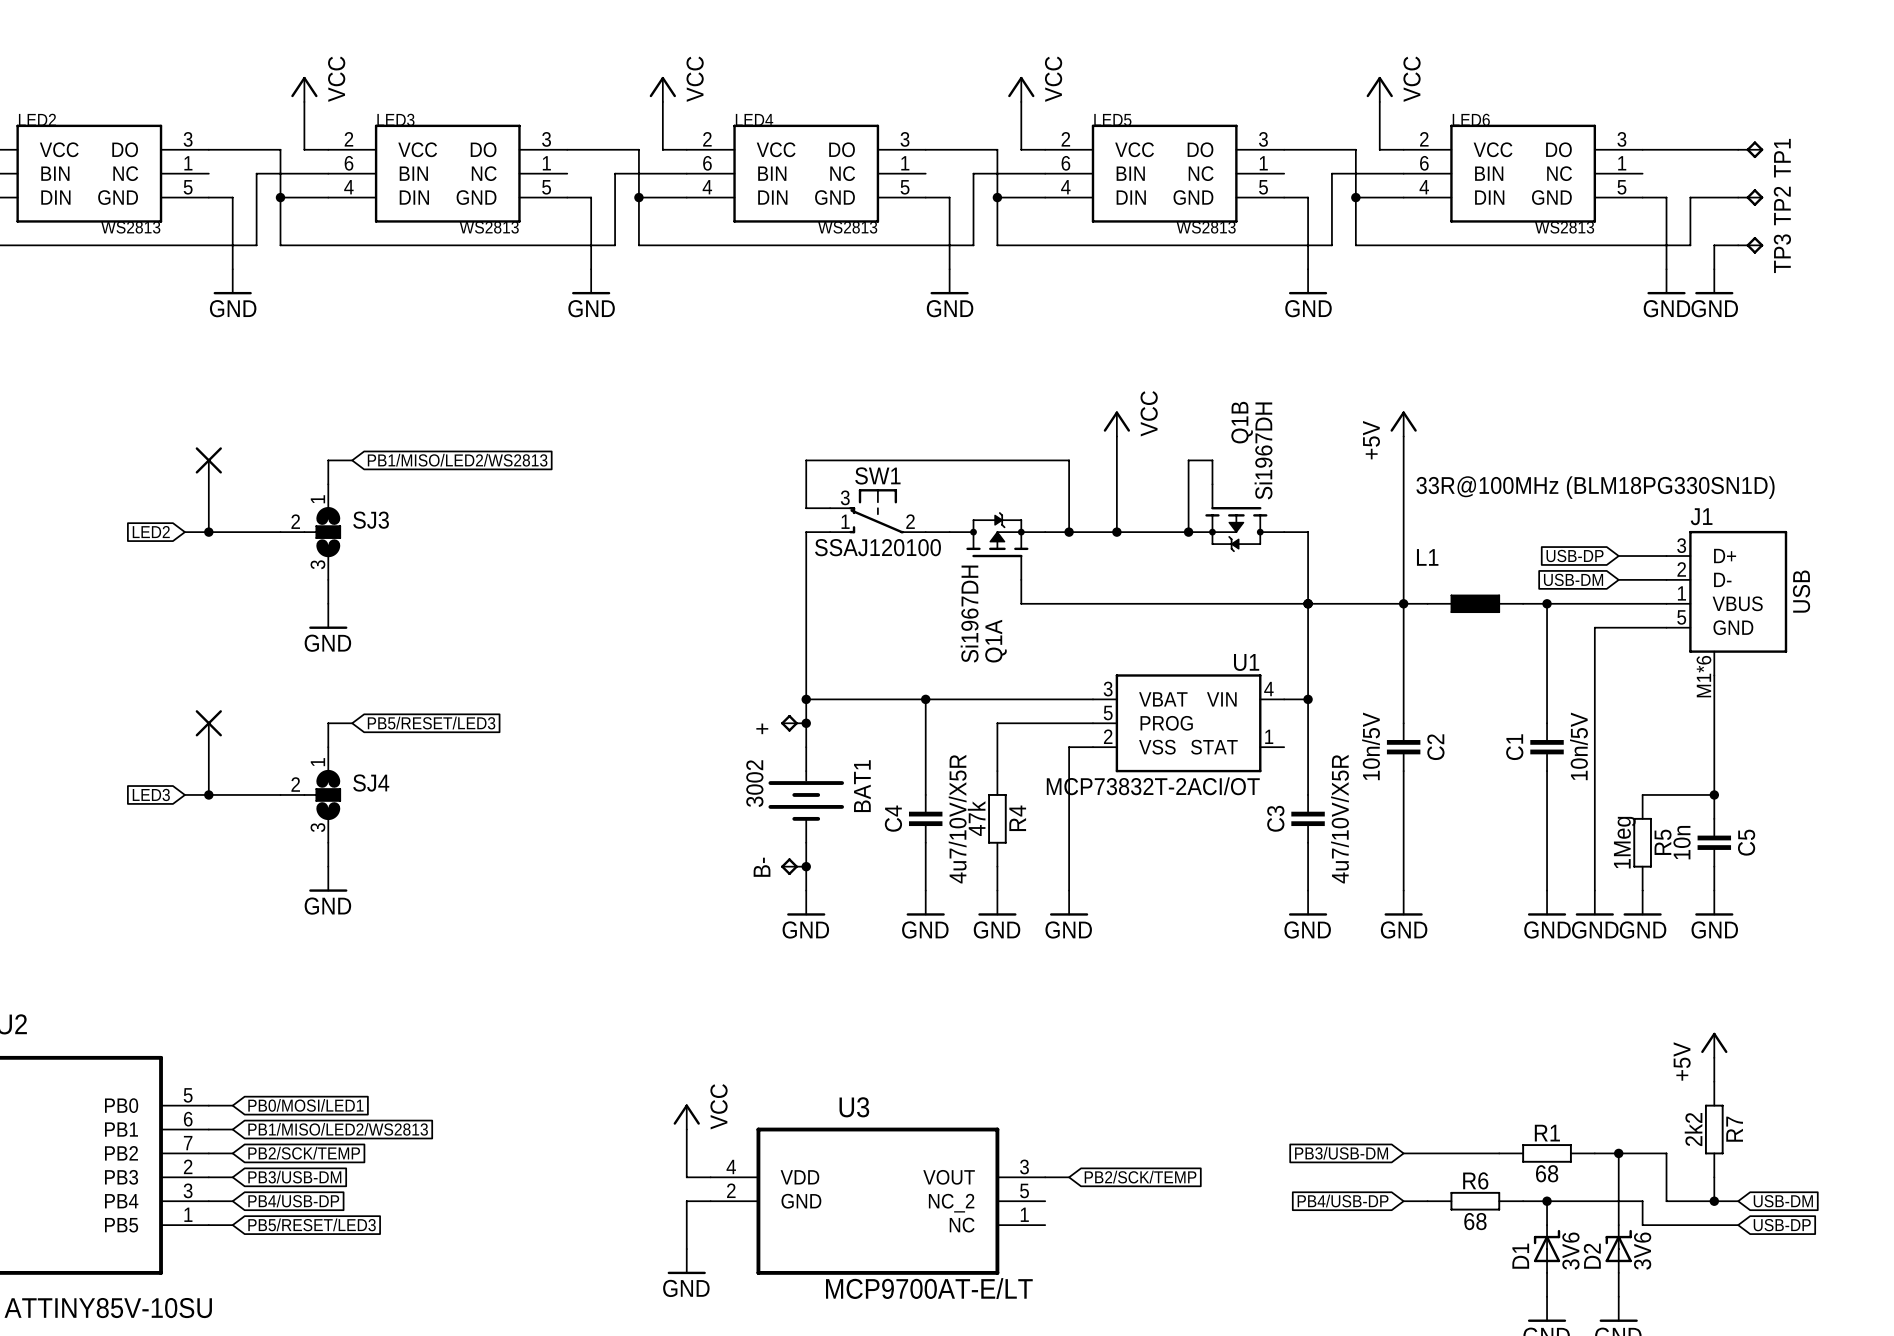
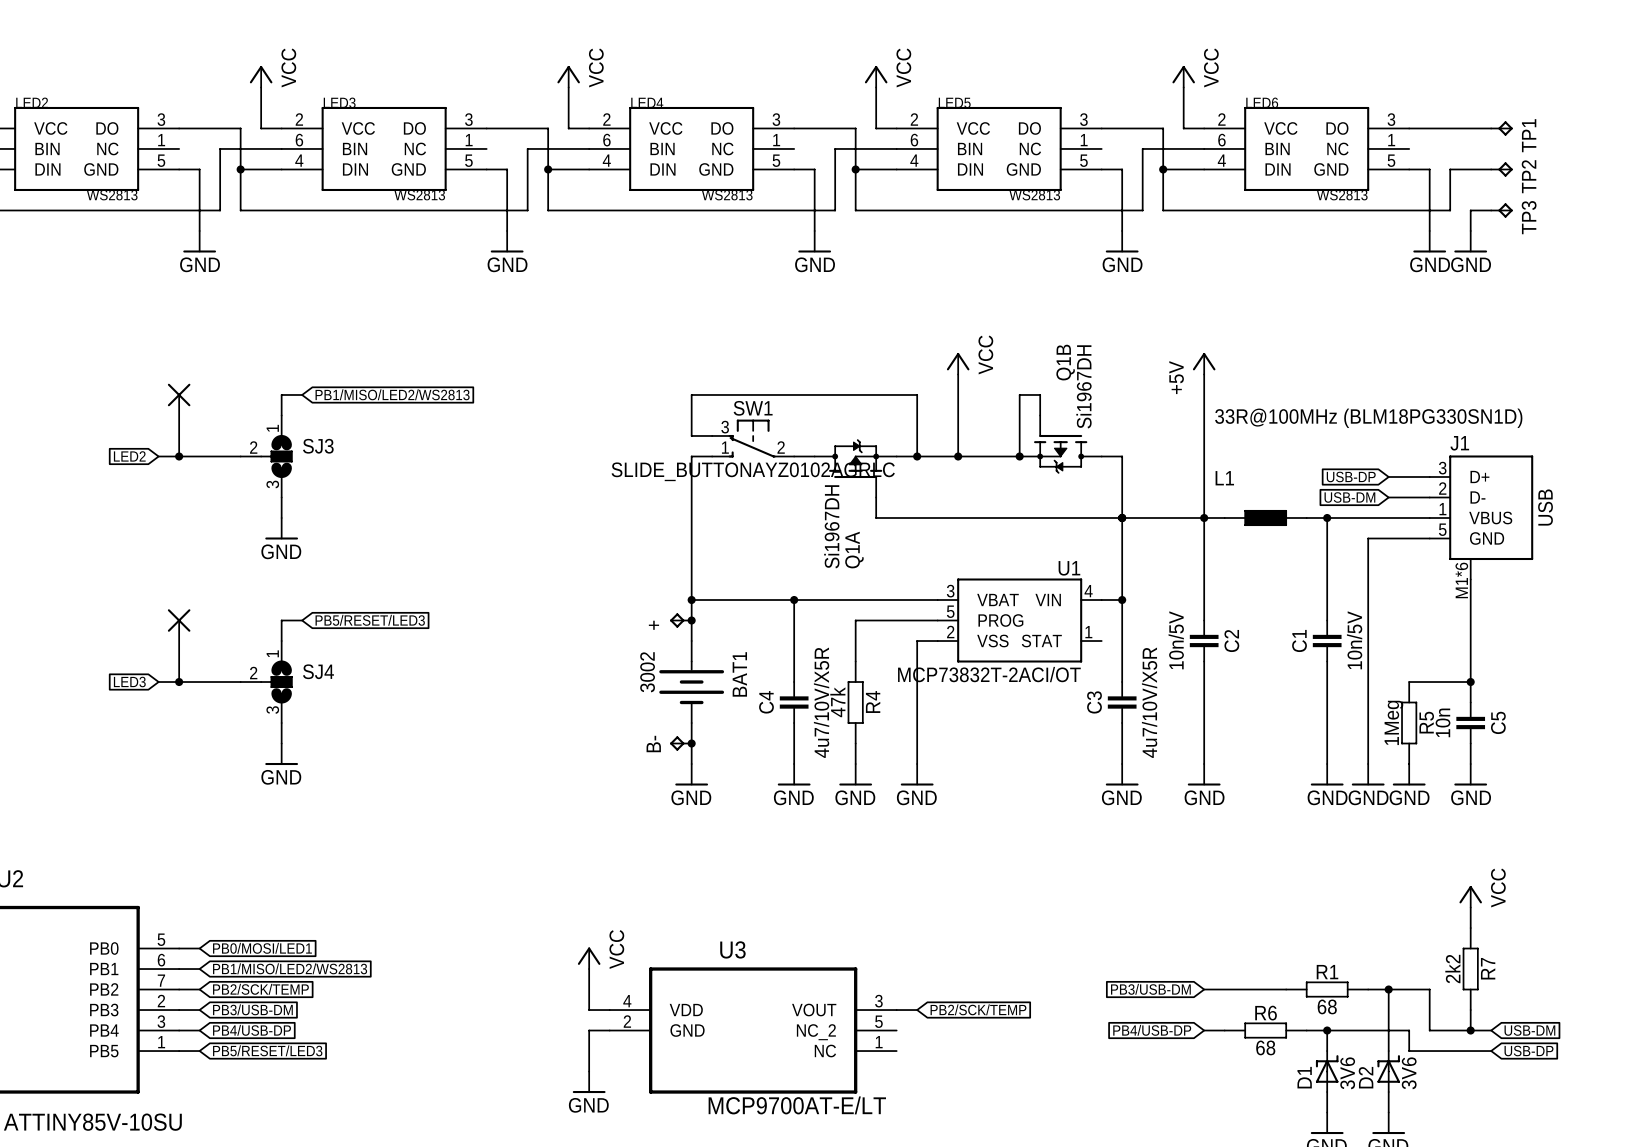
SW1 value: SSAJ120100 (877, 547) -> SLIDE_BUTTONAYZ0102AGRLC (753, 471)
power symbol: +5V (1714, 1045) -> VCC (1470, 896)

